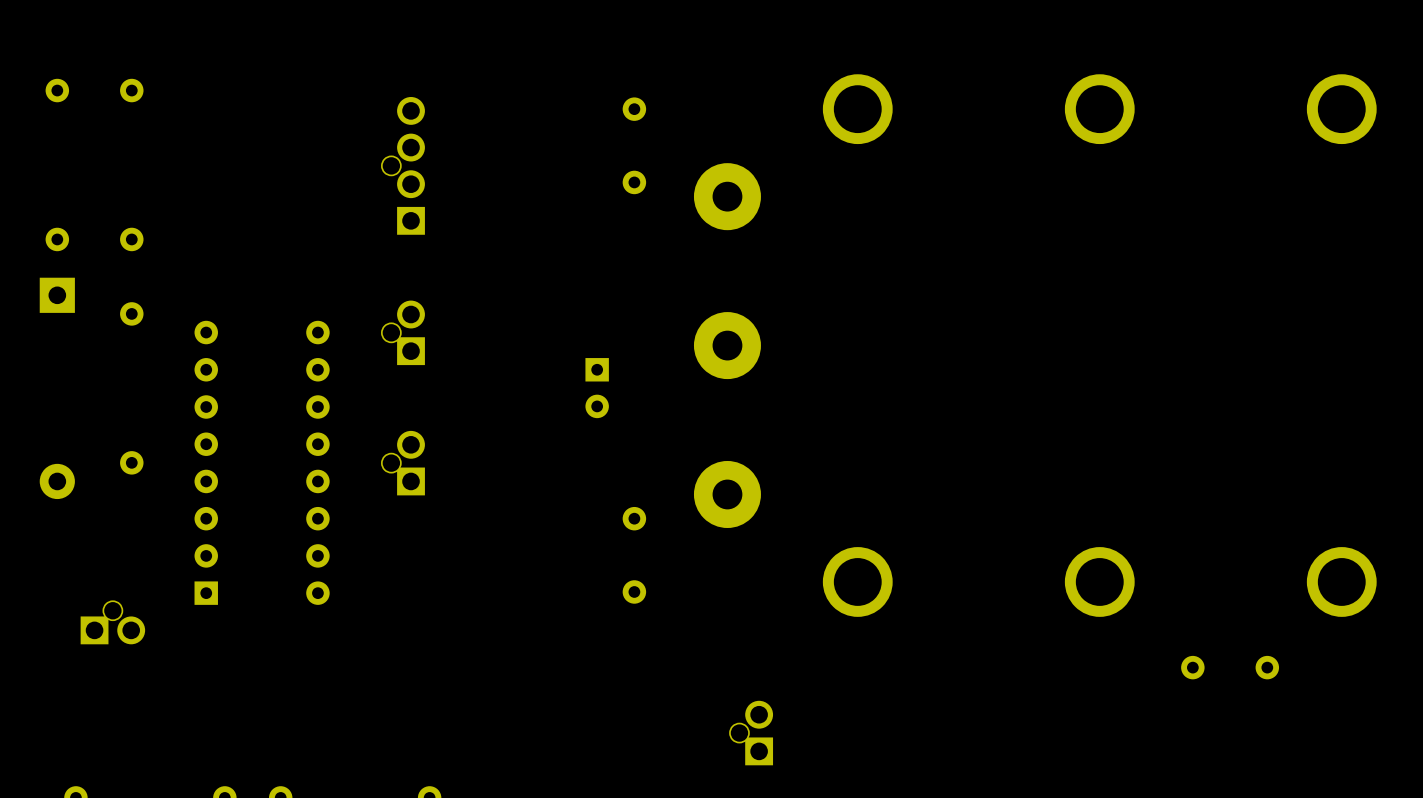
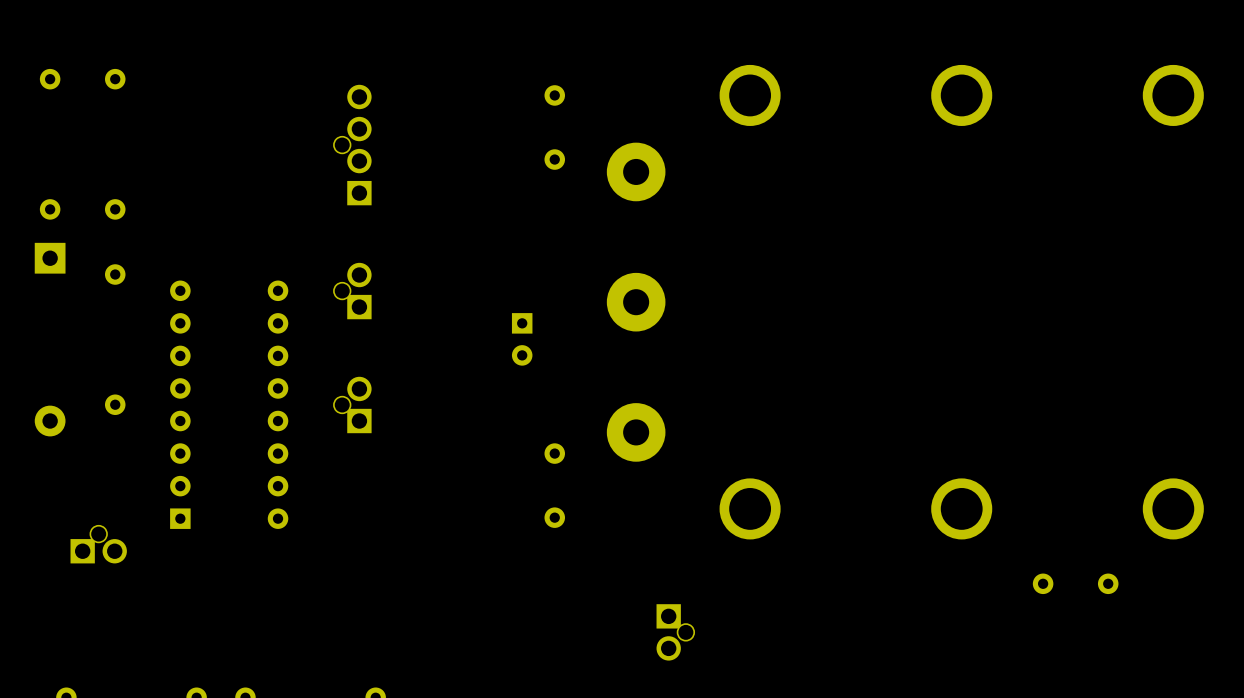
part rotation: 0° (751, 733) -> 180° (675, 632)

